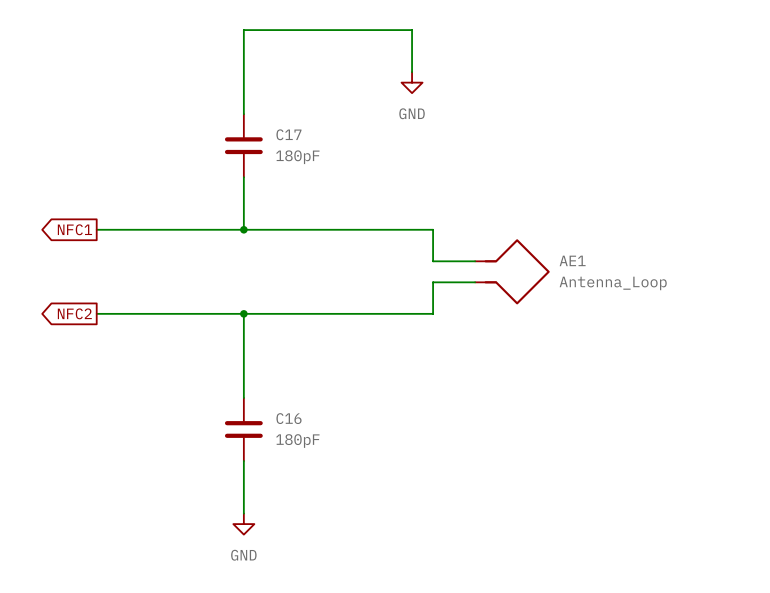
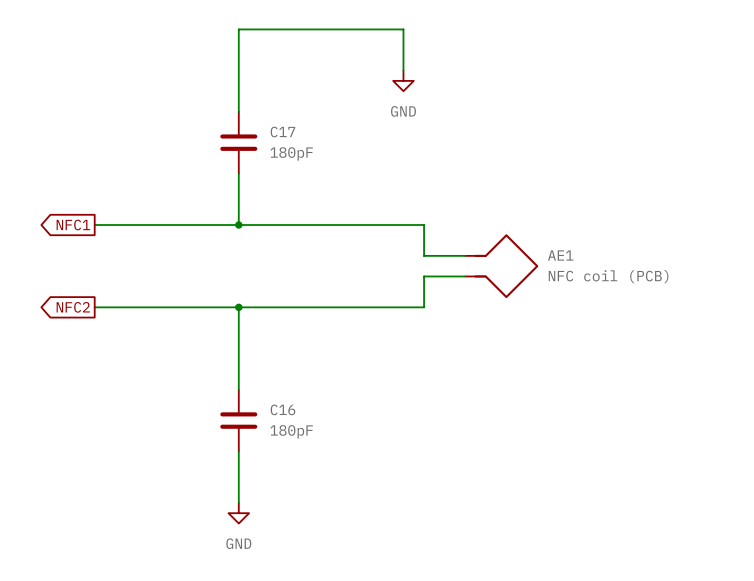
AE1 value: Antenna_Loop (613, 283) -> NFC coil (PCB) (608, 276)

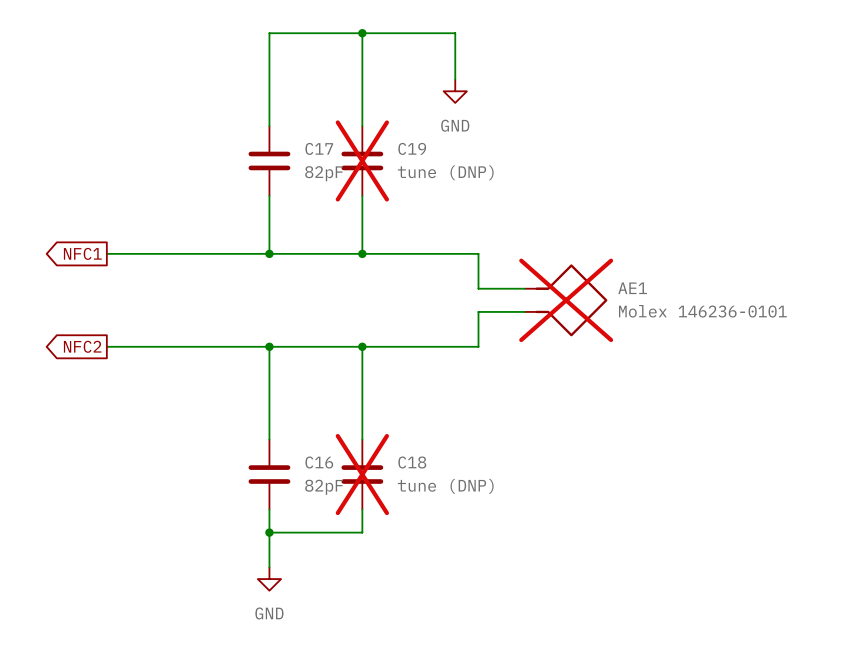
wire: none -> (362, 33) (362, 126)
junction: none -> (362, 33)
C19: none -> tune (DNP) (362, 160)
C17 value: 180pF (291, 153) -> 82pF (324, 173)
wire: none -> (362, 195) (362, 253)
junction: none -> (362, 253)
AE1 do-not-place cross: none -> (566, 300)
AE1 value: NFC coil (PCB) (608, 276) -> Molex 146236-0101 (702, 311)
wire: none -> (362, 346) (362, 439)
junction: none -> (362, 346)
C18: none -> tune (DNP) (362, 474)
C16 value: 180pF (291, 431) -> 82pF (324, 487)
wire: none -> (362, 509) (362, 532) (269, 532)
junction: none -> (269, 532)

